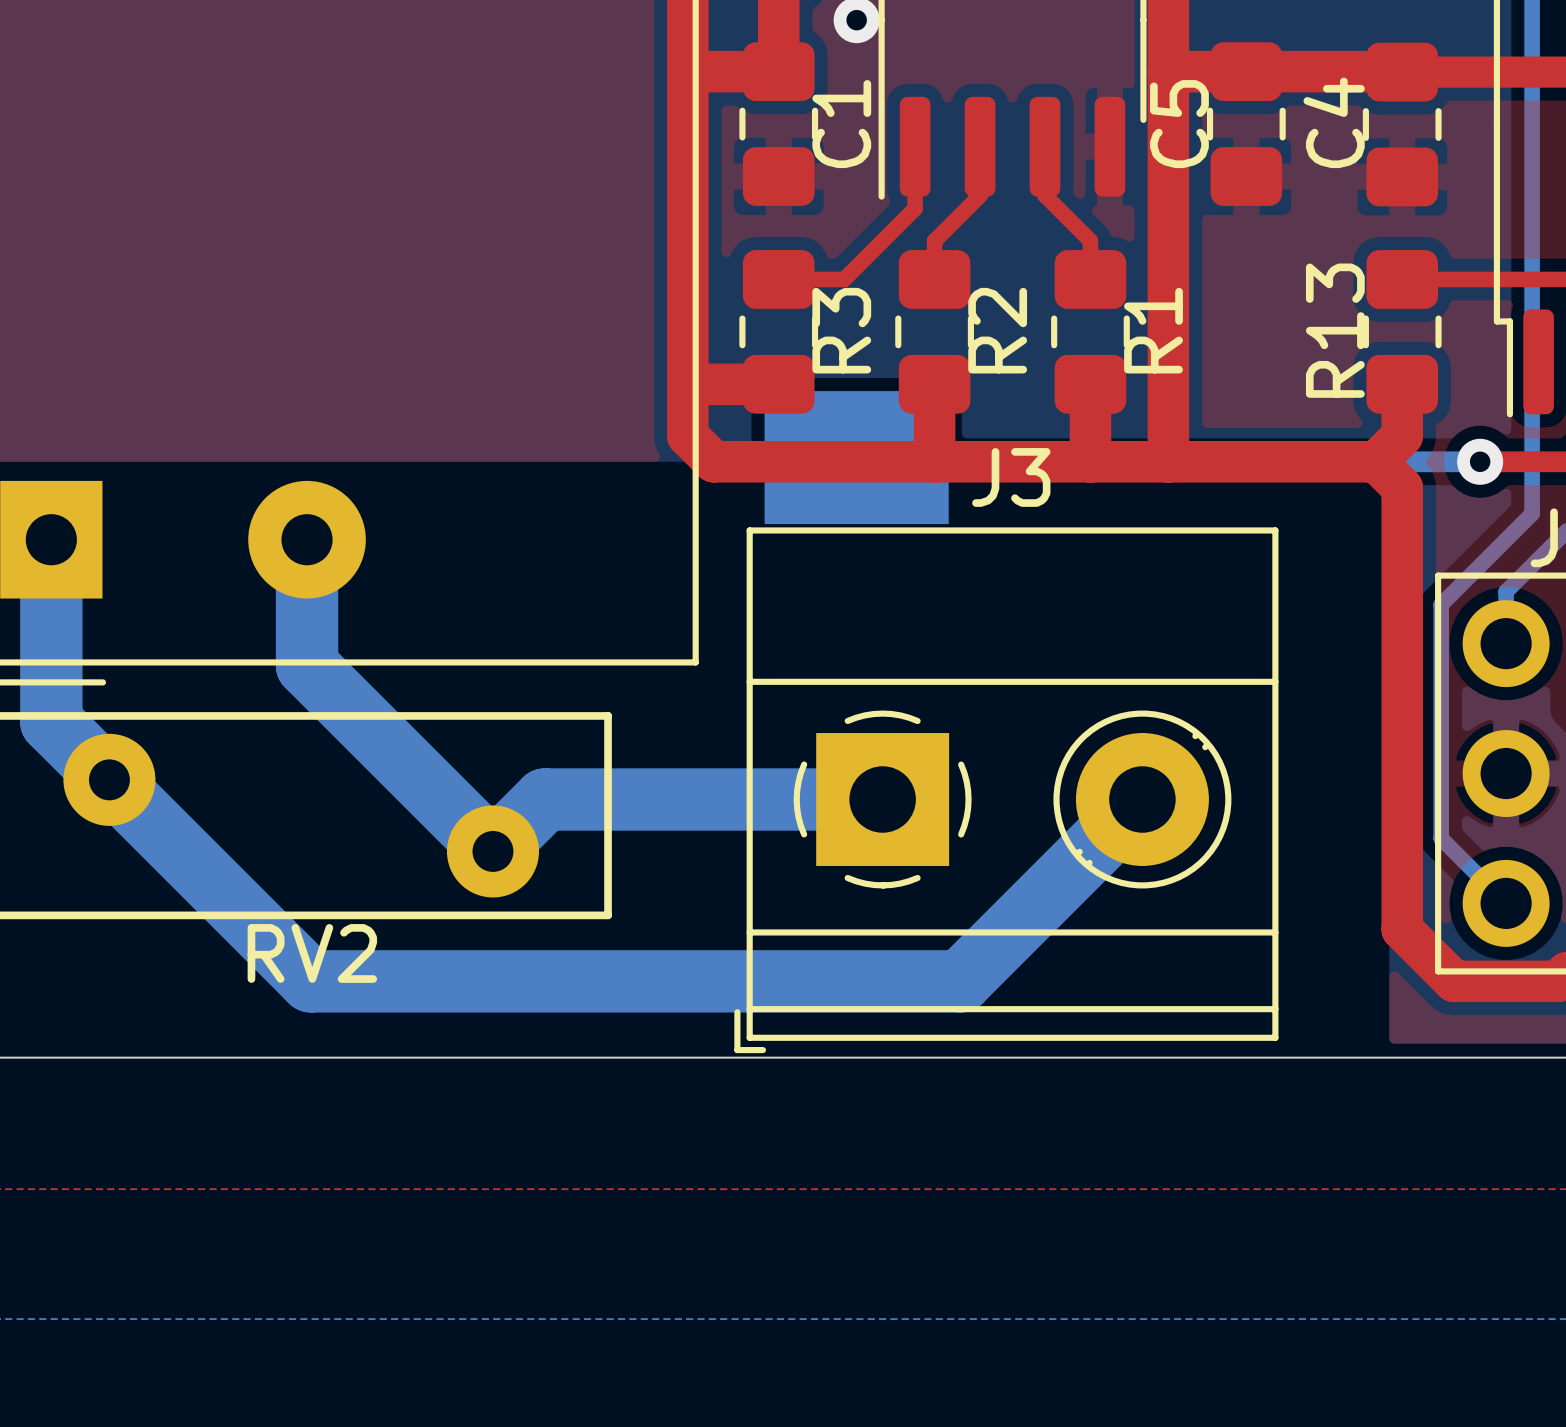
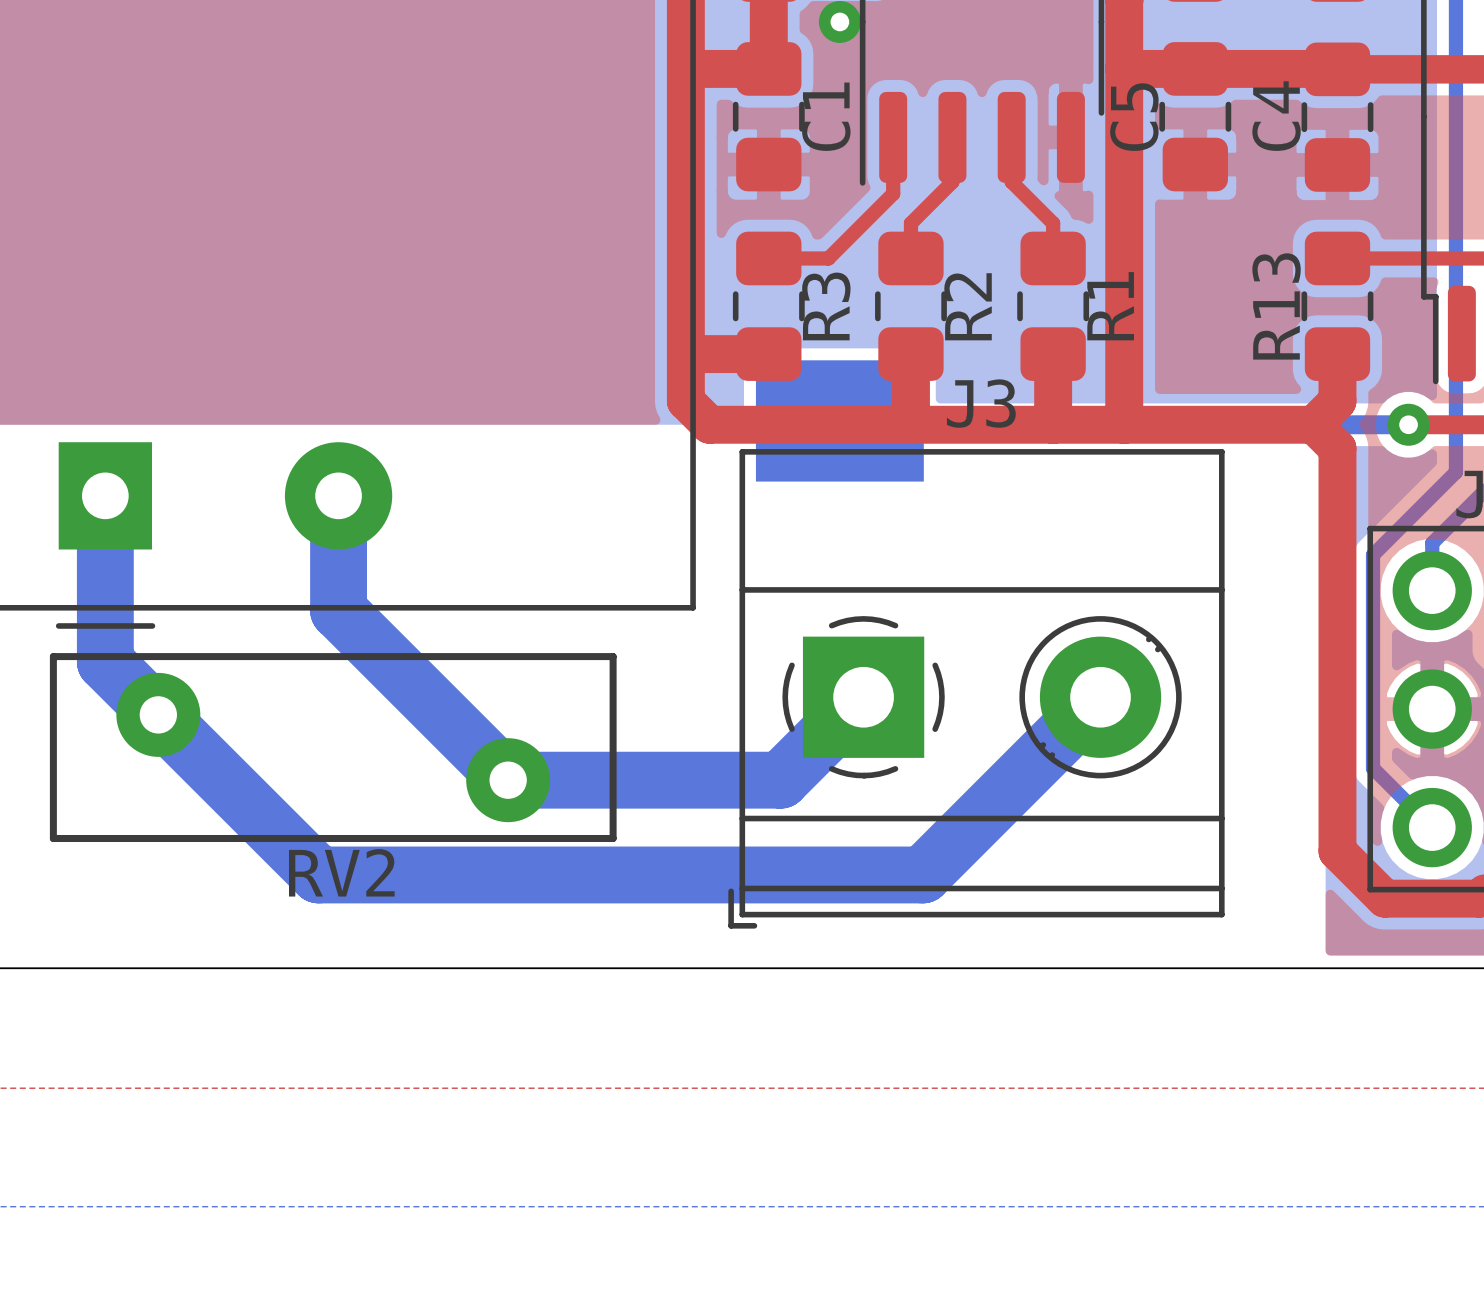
bottom track: (109, 779) (310, 981) (960, 981) (1142, 799) -> (158, 714) (318, 874) (922, 874) (1100, 697)
J3 position: (1006, 790) -> (976, 688)
bottom track: (882, 799) (544, 799) (492, 851) -> (863, 697) (780, 780) (508, 780)

